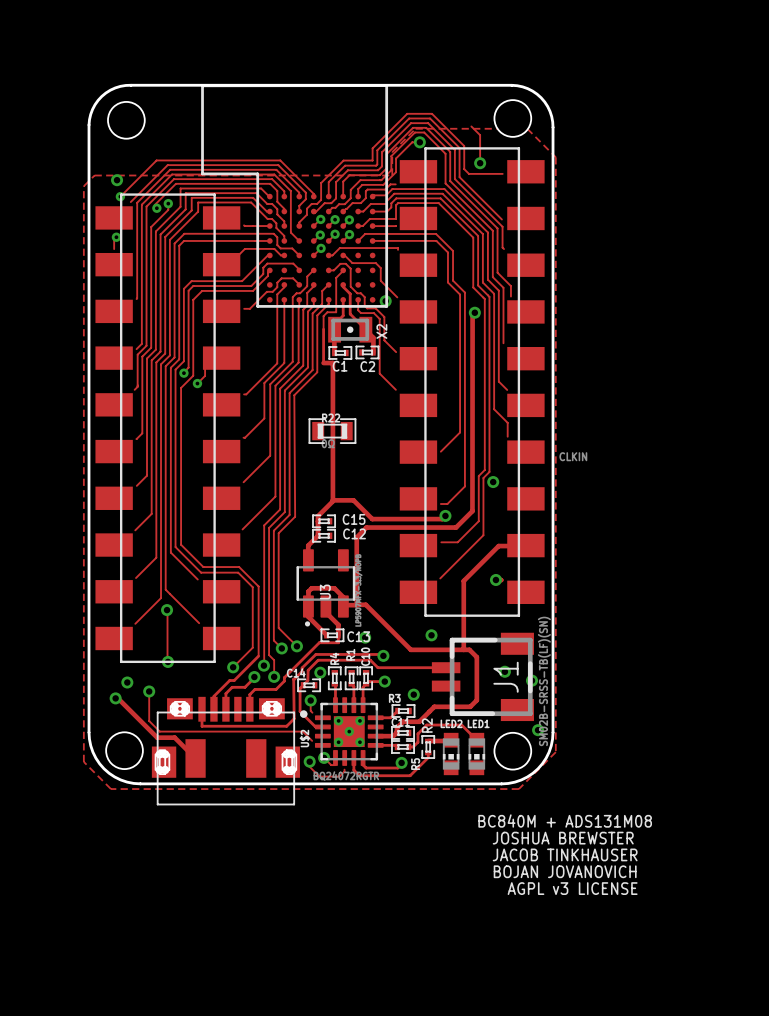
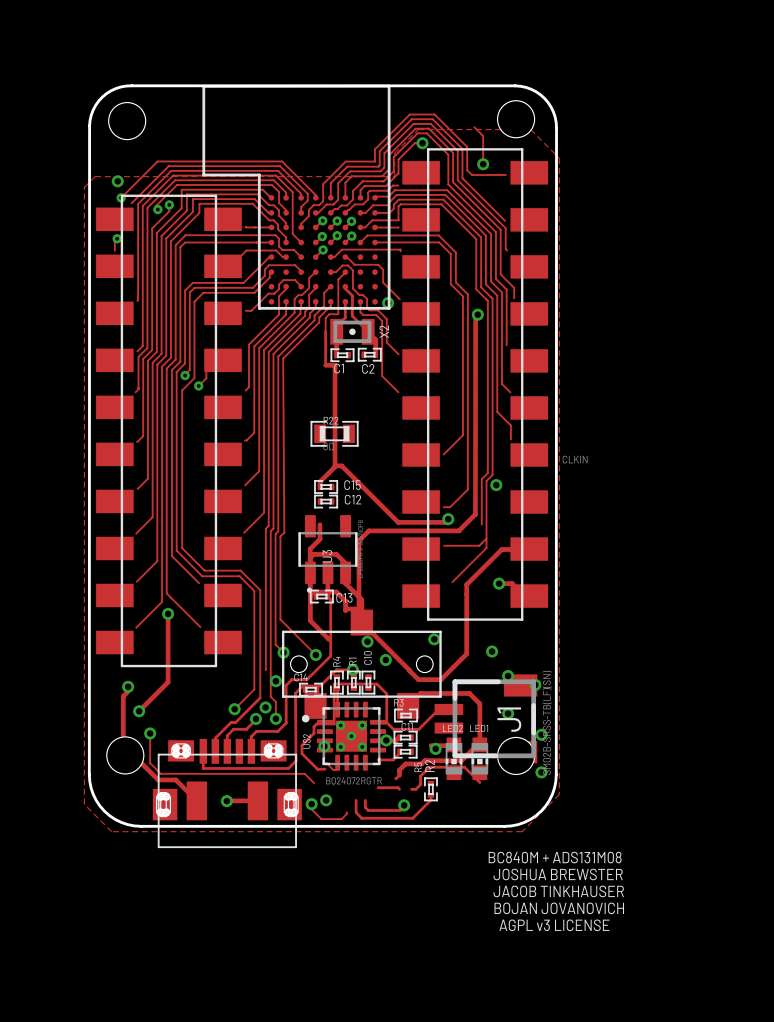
board edge: (89, 124) (89, 739) (95, 758) (104, 768) (120, 779) (140, 783) (501, 783) (514, 782) (527, 777) (537, 768) (546, 758) (551, 745) (553, 732) (553, 127) -> (89, 125) (89, 781) (96, 800) (109, 815) (127, 824) (141, 826) (504, 826) (517, 824) (530, 819) (541, 811) (549, 800) (554, 788) (556, 774) (556, 128)
track: (292, 310) (292, 361) (270, 384) (270, 455) (257, 468) -> (294, 312) (259, 348) (259, 471)
track: (298, 311) (298, 362) (275, 385) (275, 496) (262, 509) -> (300, 313) (264, 350) (264, 512)
track: (277, 312) (277, 363) (244, 394) -> (279, 314) (248, 344) (248, 387) (245, 390)
track: (284, 312) (284, 363) (264, 383) (264, 418) (252, 430) -> (286, 314) (254, 346) (254, 432)
track: (303, 313) (303, 365) (280, 388) (280, 509) (267, 522) -> (305, 315) (268, 352) (268, 525)
track: (307, 315) (307, 367) (284, 390) (284, 512) (271, 525) -> (309, 317) (273, 354) (273, 528)
track: (312, 318) (312, 370) (289, 393) (289, 514) (276, 528) -> (314, 320) (278, 356) (278, 531)
track: (317, 320) (317, 372) (294, 395) (295, 516) (282, 529) -> (319, 322) (283, 358) (284, 532)
track: (332, 463) (332, 501) (318, 516) (318, 521) -> (335, 466) (320, 481) (320, 486)
track: (332, 500) (353, 500) (372, 519) (395, 519) -> (335, 465) (341, 465) (398, 522)
C15 position: (324, 521) -> (326, 486)
track: (478, 521) (457, 542) -> (479, 545) (460, 545)
C12 position: (324, 535) -> (326, 501)
track: none -> (486, 538) (486, 548) (452, 582)
track: (476, 542) (440, 578) -> none
track: none -> (504, 583) (512, 583) (514, 585)
U3 position: (325, 587) -> (327, 553)
track: none -> (310, 595) (310, 557) (313, 554) (336, 554) (345, 563) (345, 583) (361, 599) (361, 622) (418, 679) (441, 679) (466, 653)
track: (356, 604) (365, 604) (410, 649) (469, 649) (476, 657) (476, 699) -> (408, 705) (420, 693) (469, 693) (479, 703)
track: (325, 606) (325, 612) (338, 624) (338, 642) (319, 642) (284, 677) (284, 681) -> (327, 572) (327, 596) (330, 599) (330, 656) (306, 679) (291, 679) (286, 685)
track: (167, 610) (167, 661) -> (168, 613) (168, 682) (139, 711)
track: (278, 615) (278, 628) (296, 646) -> (280, 619) (315, 654)
C13 position: (332, 635) -> (321, 596)
via: (296, 646) -> none
track: (252, 647) (233, 667) -> (254, 651) (254, 689) (234, 709)
via: none -> (492, 651)
via: none -> (315, 654)
track: (269, 655) (274, 660) (274, 676) -> (270, 659) (270, 696) (275, 702) (275, 718)
track: (383, 655) (315, 654) (293, 679) (294, 718) (286, 726) (202, 726) (202, 709) -> none
track: (258, 656) (234, 680) (229, 680) (213, 696) (213, 709) -> (260, 660) (260, 697) (235, 722) (231, 722) (215, 738) (215, 751)
part: none -> (361, 664)
via: (167, 661) -> none
via: (263, 665) -> none
track: none -> (352, 669) (336, 669) (320, 685) (302, 685) (295, 693) (296, 760) (288, 768) (203, 768) (203, 751)
via: none -> (352, 669)
via: (233, 667) -> none
track: (446, 667) (377, 667) (370, 660) (318, 660) (308, 670) (307, 680) (300, 688) (300, 711) (315, 726) (322, 726) -> none
via: (320, 672) -> none
J1 position: (482, 676) -> (485, 718)
track: (254, 677) (244, 687) (232, 687) (225, 693) (225, 709) -> (255, 718) (246, 729) (233, 729) (227, 735) (227, 751)
via: (254, 677) -> none
track: none -> (334, 684) (376, 684) (386, 693) (386, 722) (393, 729) (418, 729) (438, 709) (448, 709)
track: none -> (334, 684) (334, 723) (316, 723) (313, 726) (313, 733) (301, 745) (301, 753) (317, 769) (324, 769)
track: (284, 681) (276, 689) (254, 689) (249, 694) (249, 709) -> (286, 685) (286, 723) (277, 731) (256, 731) (251, 736) (251, 751)
track: (384, 681) (368, 681) (363, 687) (363, 705) -> none
via: (384, 681) -> none
track: (351, 684) (353, 686) (353, 705) -> none
track: none -> (127, 691) (123, 696) (123, 744) (158, 779) (175, 779) (196, 800)
track: (149, 691) (149, 721) (159, 731) (302, 731) (312, 740) -> (150, 733) (150, 763) (160, 773) (304, 773) (314, 783)
via: (149, 691) -> none
via: (413, 694) -> none
track: (115, 698) (117, 698) (157, 737) (174, 737) (195, 758) -> none
via: (115, 698) -> none
track: (310, 700) (312, 712) -> none
via: (310, 700) -> none
track: (476, 700) (470, 706) (434, 706) (419, 721) (403, 721) (397, 727) (397, 732) (393, 736) -> (479, 704) (479, 742) (461, 760) (424, 760) (421, 763) (405, 763) (399, 770) (399, 775) (395, 778)
via: none -> (265, 707)
via: none -> (234, 709)
via: none -> (139, 711)
via: none -> (508, 713)
track: (397, 711) (390, 717) (375, 717) -> (400, 753) (393, 759) (378, 759)
via: none -> (255, 718)
via: none -> (275, 718)
via: none -> (150, 733)
via: none -> (386, 740)
track: (476, 740) (461, 725) (426, 725) (417, 733) (417, 742) (413, 746) (409, 746) -> (479, 782) (464, 767) (429, 767) (420, 776) (420, 784) (415, 789) (411, 789)
via: none -> (324, 746)
via: none -> (435, 748)
track: (375, 745) (397, 746) -> (378, 787) (397, 787) (399, 789)
R2 position: (428, 746) -> (430, 789)
part position: (225, 751) -> (227, 793)
track: (428, 752) (428, 757) (410, 775) (359, 775) (353, 770) (353, 757) -> (430, 795) (430, 800) (412, 818) (361, 818) (356, 812) (356, 800)
zone outline: (555, 752) (518, 789) (110, 789) (83, 761) -> (559, 756) (559, 794) (522, 831) (111, 831) (84, 804) (84, 766)
via: (324, 757) -> none
track: (363, 757) (363, 764) (366, 768) (397, 768) (401, 762) -> (365, 800) (365, 807) (368, 810) (400, 810) (404, 805)
track: (309, 761) (309, 766) (319, 776) (339, 776) (344, 769) -> (311, 804) (311, 809) (321, 819) (341, 819) (346, 812)
via: (309, 761) -> none
via: (401, 762) -> none
via: none -> (541, 772)
track: none -> (227, 800) (257, 800)
via: none -> (326, 800)
via: none -> (226, 801)
via: none -> (311, 804)
via: none -> (404, 805)
text position: BC840M + ADS131M08 (565, 821) -> BC840M + ADS131M08 (555, 857)
text position: JOSHUA BREWSTER (563, 838) -> JOSHUA BREWSTER (558, 874)
text position: JACOB TINKHAUSER (565, 854) -> JACOB TINKHAUSER (558, 891)
text position: BOJAN JOVANOVICH (565, 871) -> BOJAN JOVANOVICH (559, 908)
text position: AGPL v3 LICENSE (572, 888) -> AGPL v3 LICENSE (554, 925)

